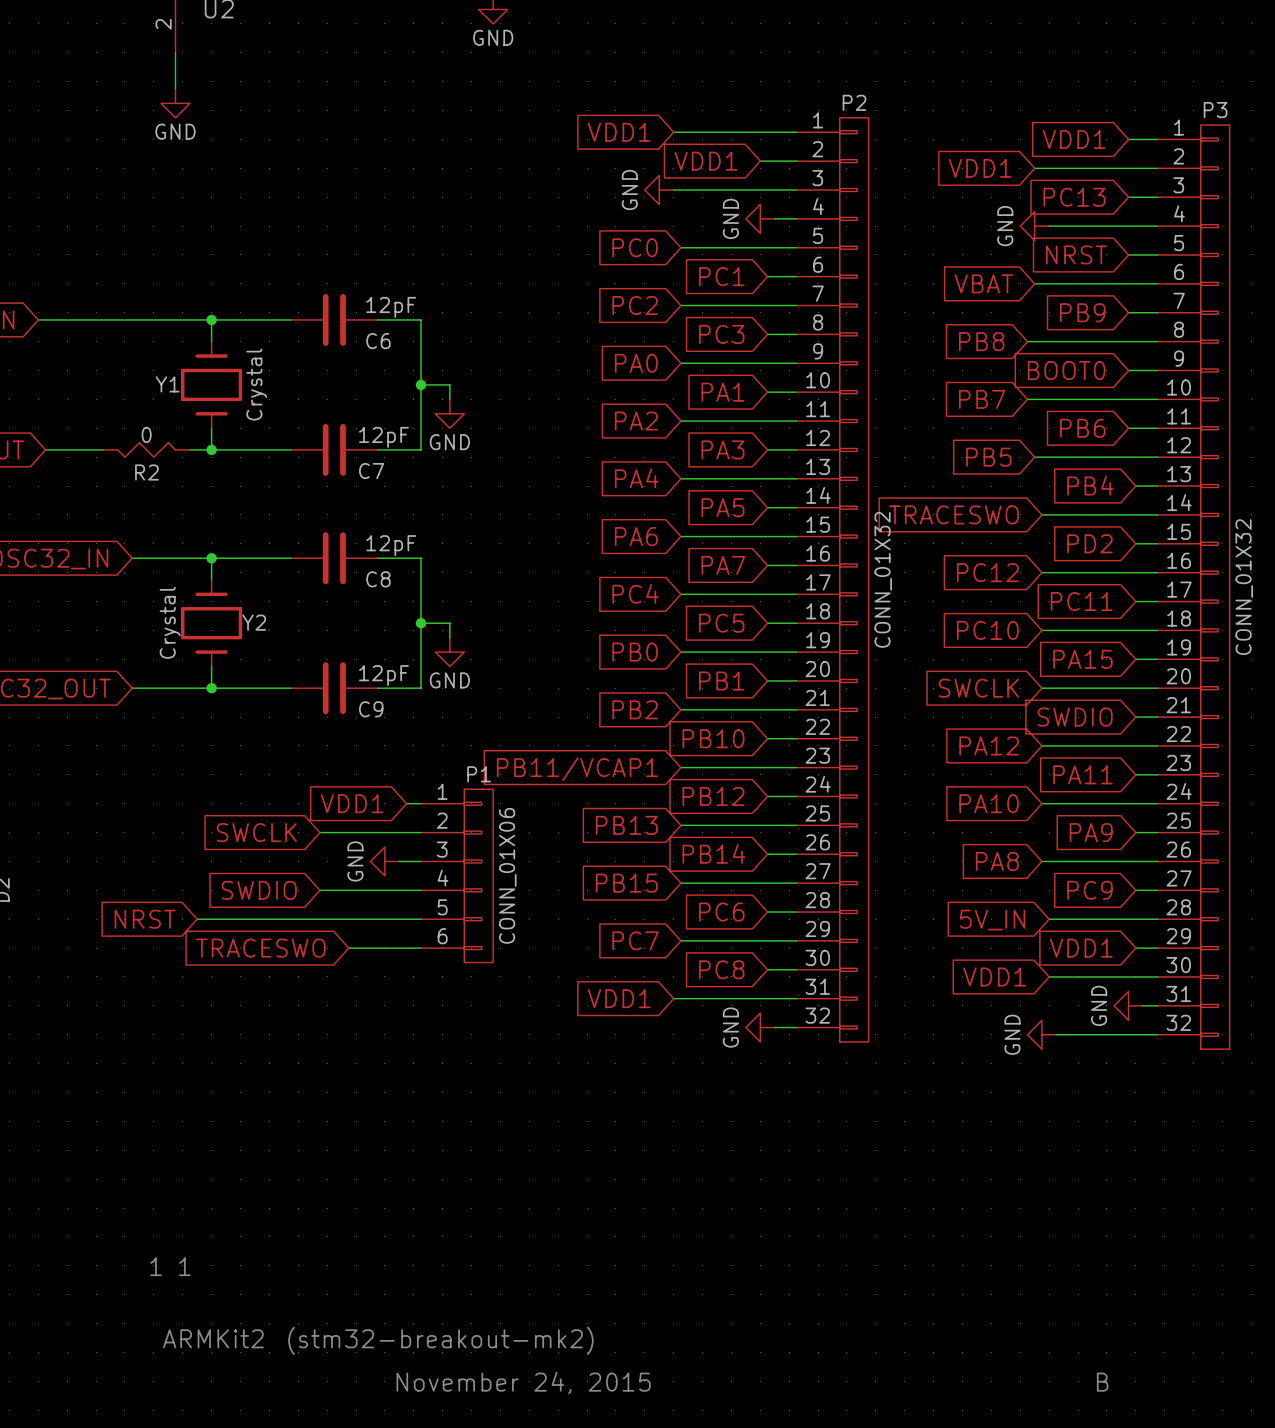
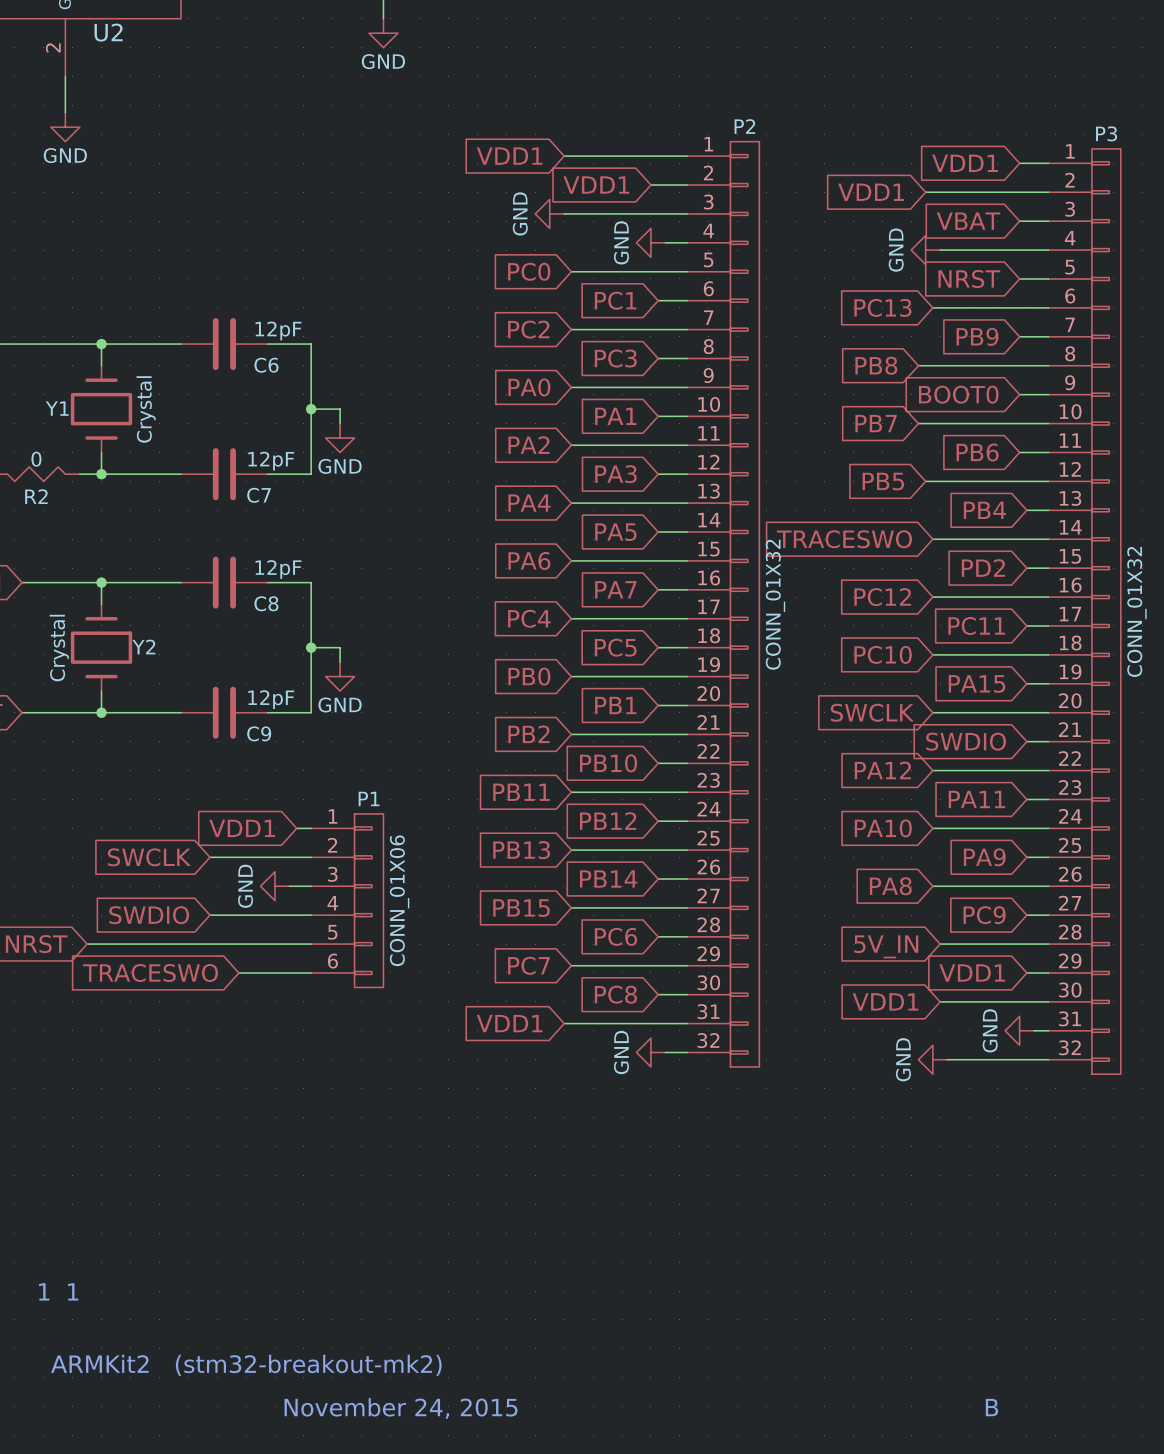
global label: PC13 (1074, 197) -> VBAT (968, 221)
global label: VBAT (983, 283) -> PC13 (882, 307)
wire: (1034, 283) (1041, 283) -> none
global label: PB11/VCAP1 (577, 769) -> PB11 (521, 792)

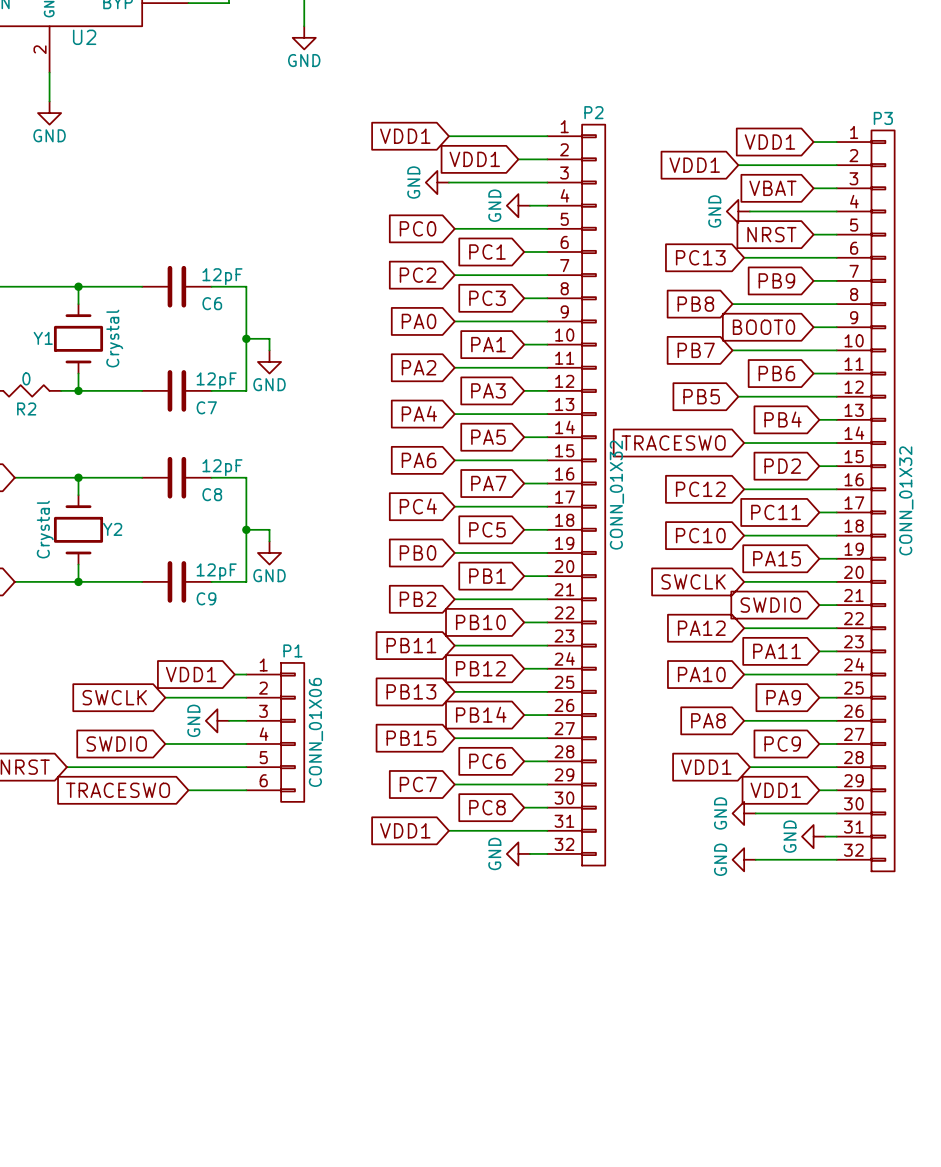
global label: 5V_IN (886, 946) -> VDD1 (706, 767)
global label: VDD1 (885, 1001) -> none
power symbol: none -> GND (744, 813)
text: 1 (44, 1291) -> none
text: 1 (73, 1291) -> none
text: ARMKit2 (99, 1363) -> none
text: (stm32-breakout-mk2) (308, 1365) -> none
text: B (991, 1407) -> none
text: November 24, 2015 (401, 1408) -> none

